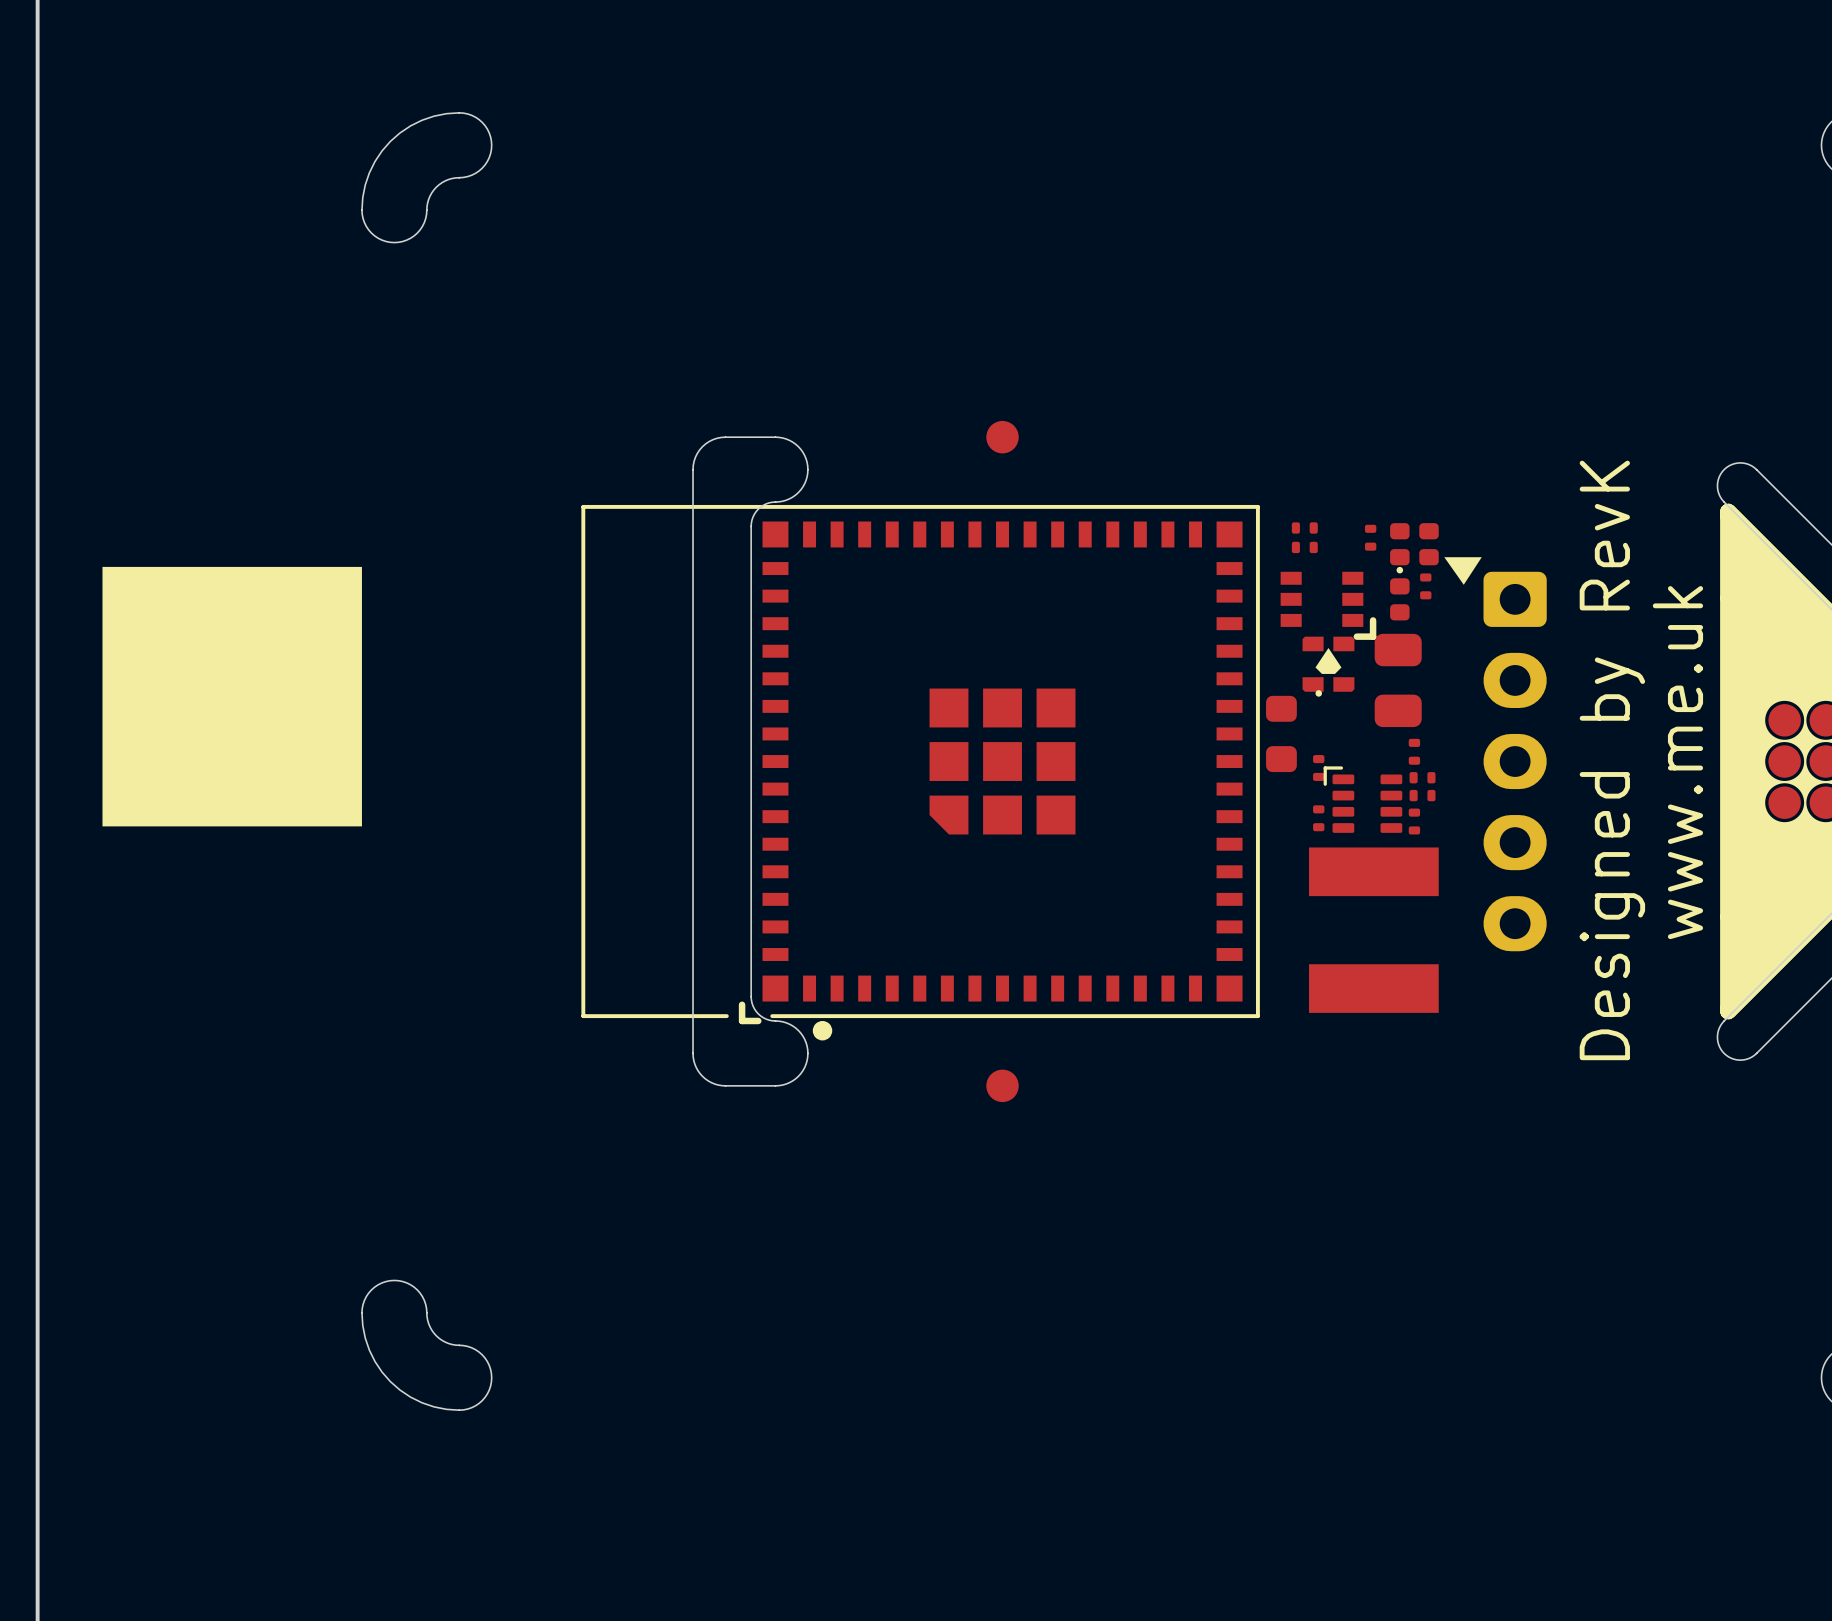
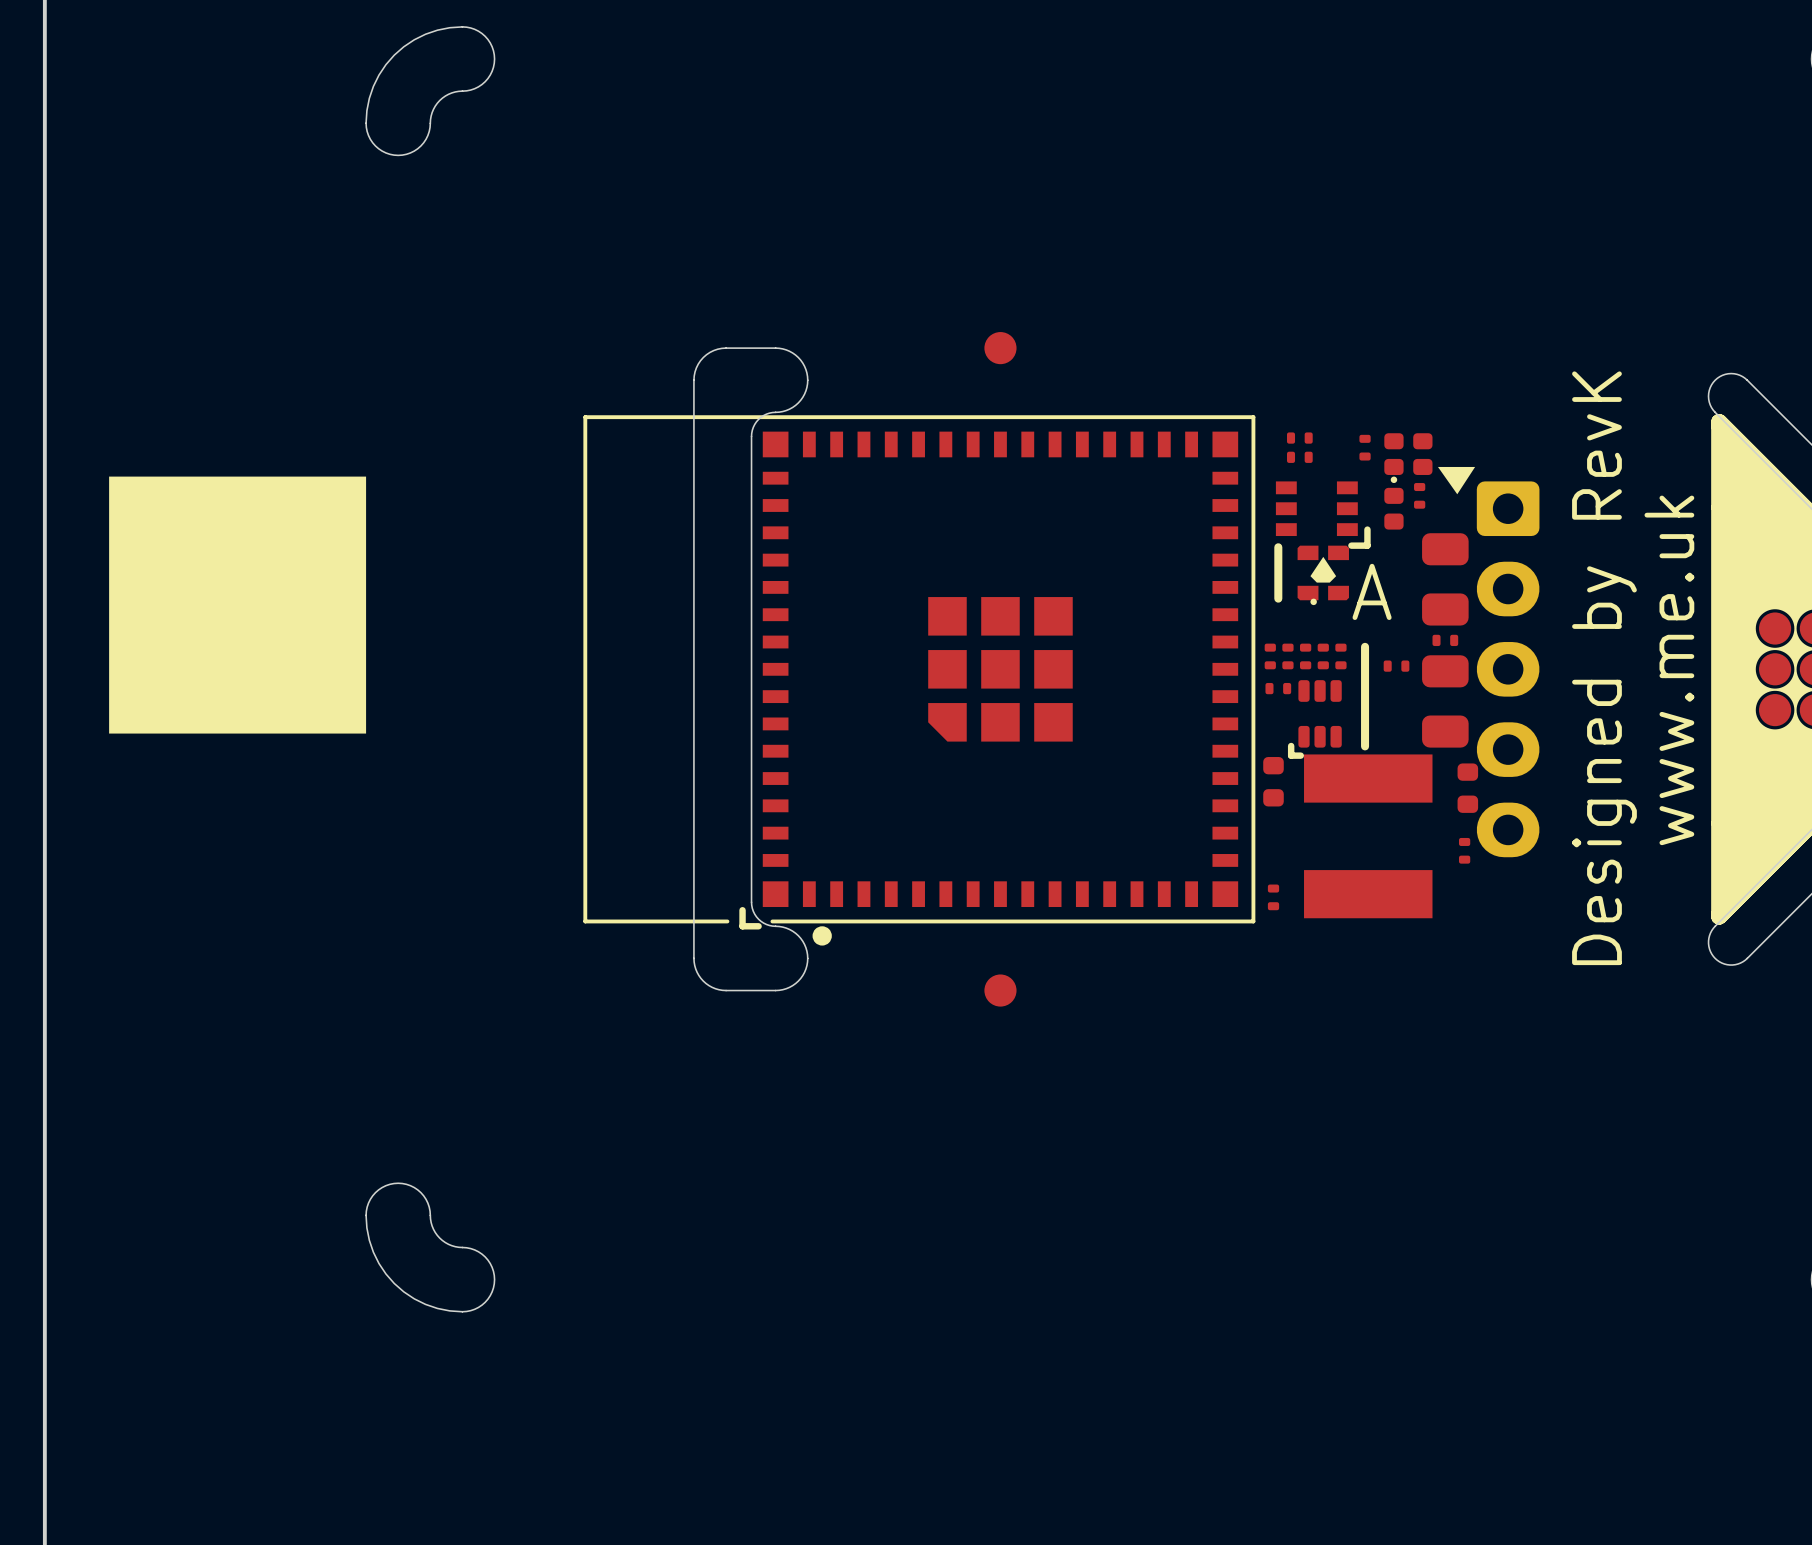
line: none -> (1278, 547) (1278, 598)
part position: (1398, 680) -> (1445, 579)
text: none -> A (1372, 591)
part: none -> (1445, 640)
part: (1281, 733) -> none
line: none -> (1365, 646) (1365, 746)
part: none -> (1270, 656)
part: none -> (1287, 656)
part: none -> (1305, 656)
part: none -> (1323, 656)
part: none -> (1340, 656)
part rotation: 0° (1414, 751) -> 90° clockwise (1396, 666)
part: (1318, 768) -> none
part: (1422, 777) -> none
part: none -> (1278, 688)
part: none -> (1445, 701)
part: (1422, 795) -> none
part: (1362, 799) -> none
part footprint: [1313, 805, 1325, 832] -> [1287, 680, 1342, 759]
part: (1414, 821) -> none
part: none -> (1273, 781)
part: none -> (1467, 788)
part: none -> (1464, 850)
part: none -> (1273, 897)

